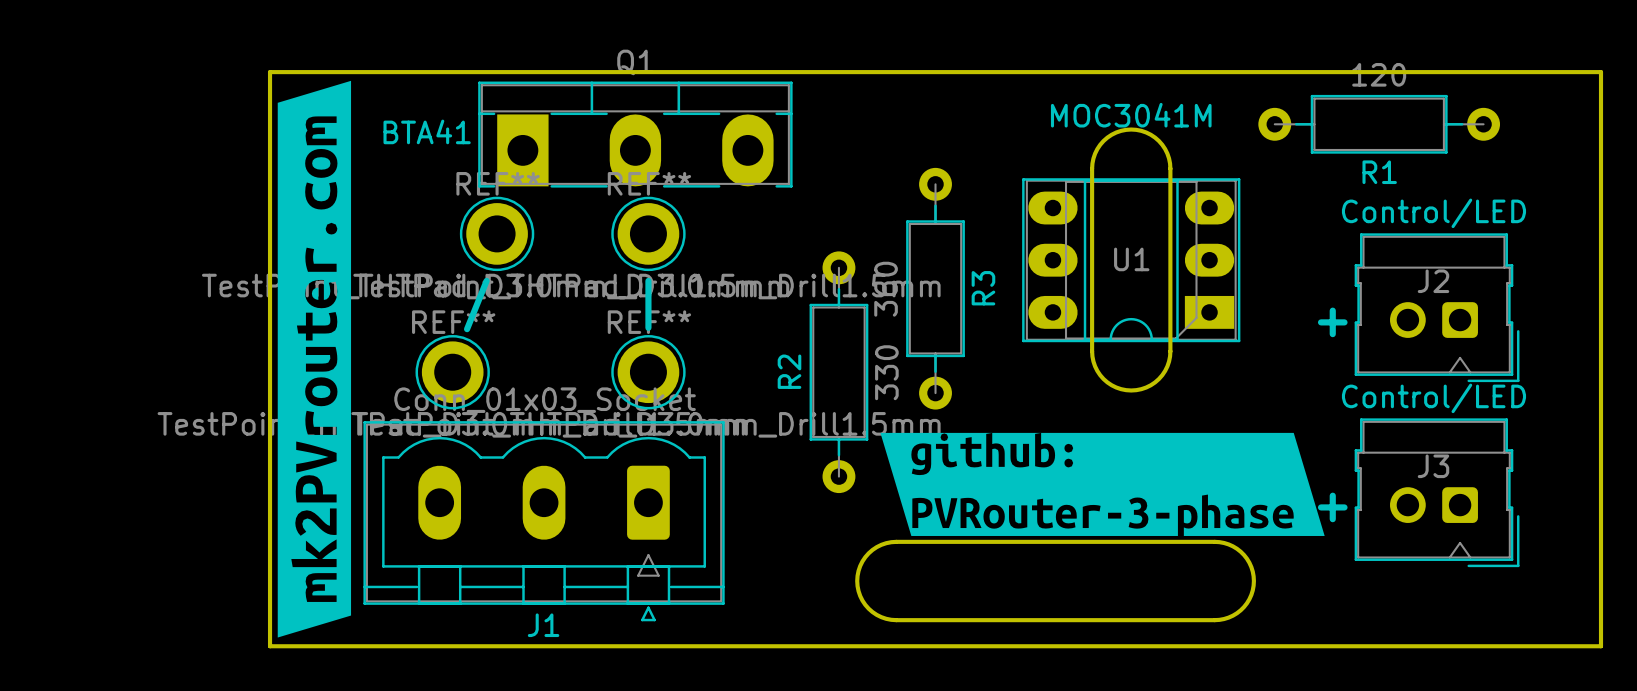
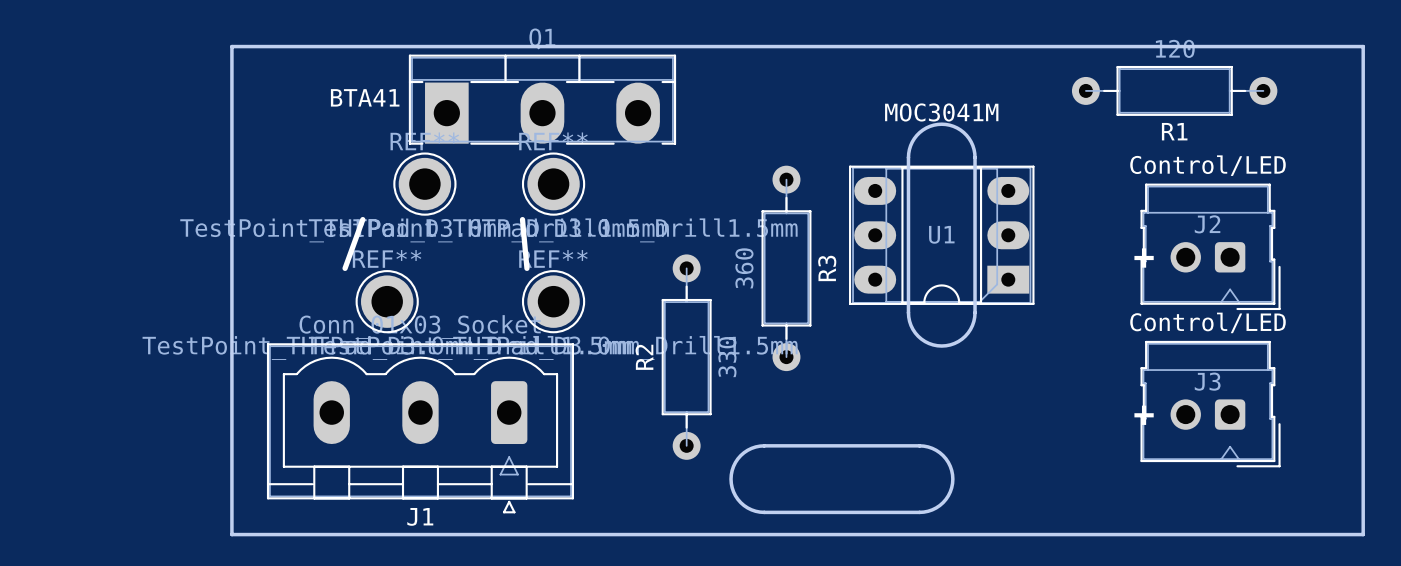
drawing: [277, 80, 352, 638] -> none
board edge: (1092, 168) (1093, 361) (1100, 375) (1111, 385) (1126, 390) (1141, 389) (1158, 379) (1167, 366) (1170, 356) (1169, 158) (1162, 144) (1155, 137) (1141, 130) (1126, 129) (1111, 134) (1100, 144) (1095, 153) (1092, 168) -> none
board edge: none -> (908, 157) (909, 321) (915, 333) (925, 341) (937, 345) (950, 344) (965, 336) (972, 325) (974, 317) (974, 149) (969, 138) (960, 130) (949, 125) (937, 124) (926, 128) (916, 135) (910, 145) (908, 157)
U1 position: (1131, 260) -> (941, 235)
line: none -> (362, 219) (345, 268)
line: none -> (522, 219) (526, 268)
line: (486, 280) (467, 329) -> none
line: (648, 280) (648, 327) -> none
R3 position: (935, 288) -> (786, 268)
J2 position: (1437, 307) -> (1210, 246)
R2 position: (838, 372) -> (686, 357)
drawing: [880, 432, 1325, 536] -> none
J3 position: (1437, 492) -> (1210, 404)
J1 position: (544, 521) -> (420, 428)
board edge: (1079, 541) (1224, 543) (1232, 546) (1244, 555) (1251, 567) (1253, 581) (1251, 594) (1244, 606) (1232, 615) (1224, 619) (1079, 620) -> (919, 445) (932, 448) (943, 455) (950, 466) (952, 479) (950, 491) (943, 502) (932, 509) (919, 512)

